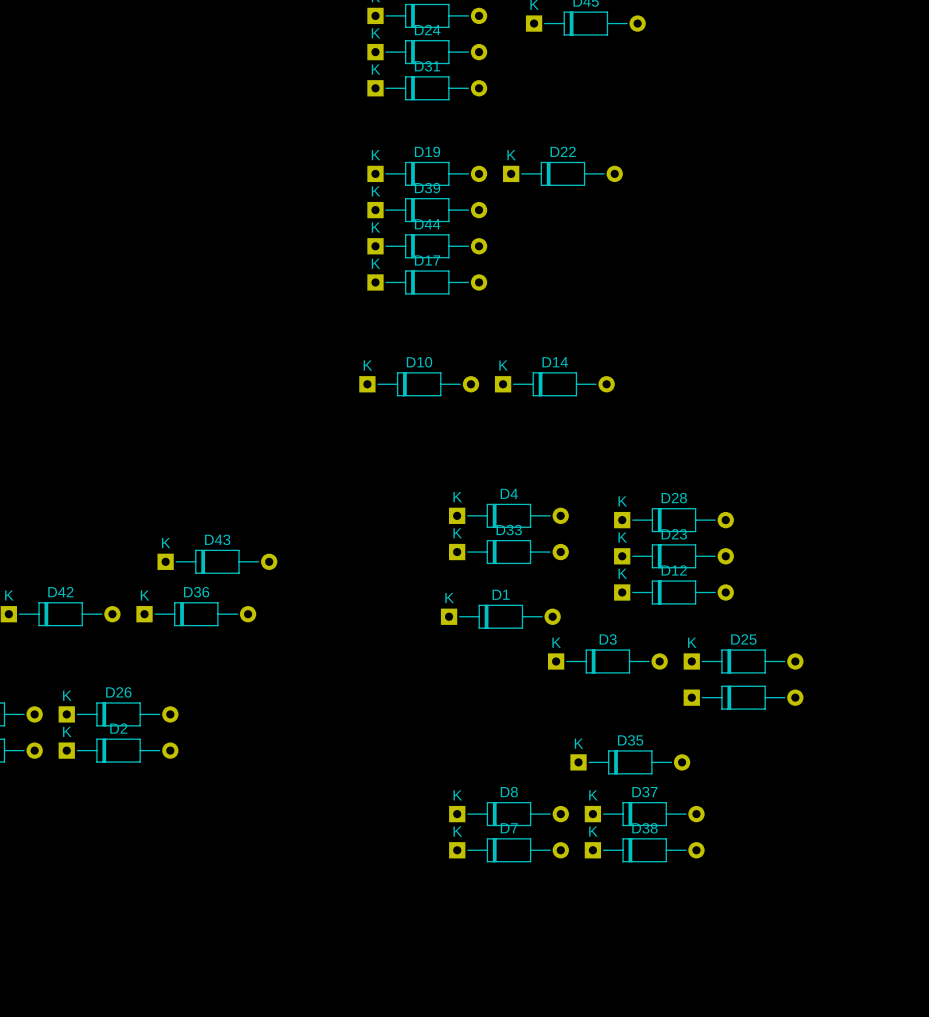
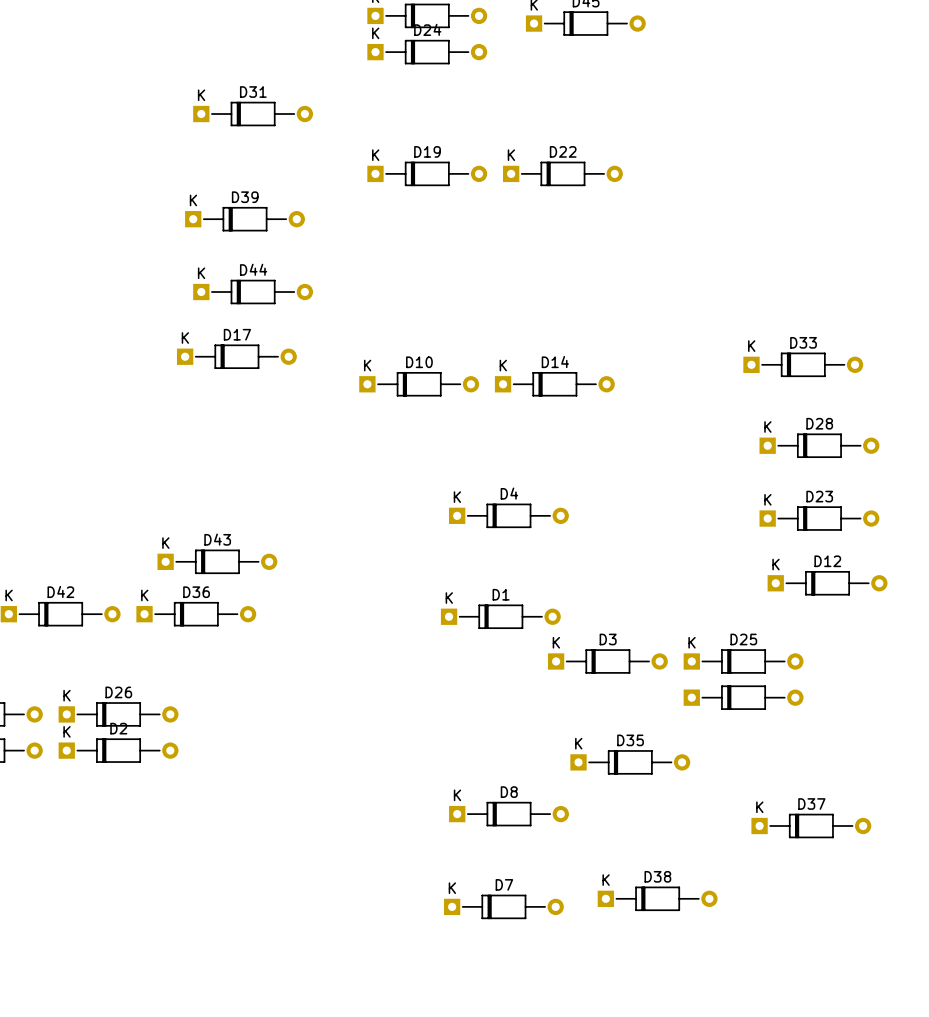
D31 position: (427, 88) -> (253, 114)
D39 position: (427, 210) -> (245, 219)
D44 position: (427, 246) -> (253, 292)
D17 position: (427, 282) -> (236, 356)
D28 position: (673, 520) -> (819, 445)
D33 position: (508, 552) -> (803, 364)
D23 position: (673, 556) -> (819, 518)
D12 position: (673, 592) -> (827, 583)
D37 position: (644, 814) -> (811, 826)
D7 position: (509, 850) -> (503, 906)
D38 position: (644, 850) -> (657, 898)

